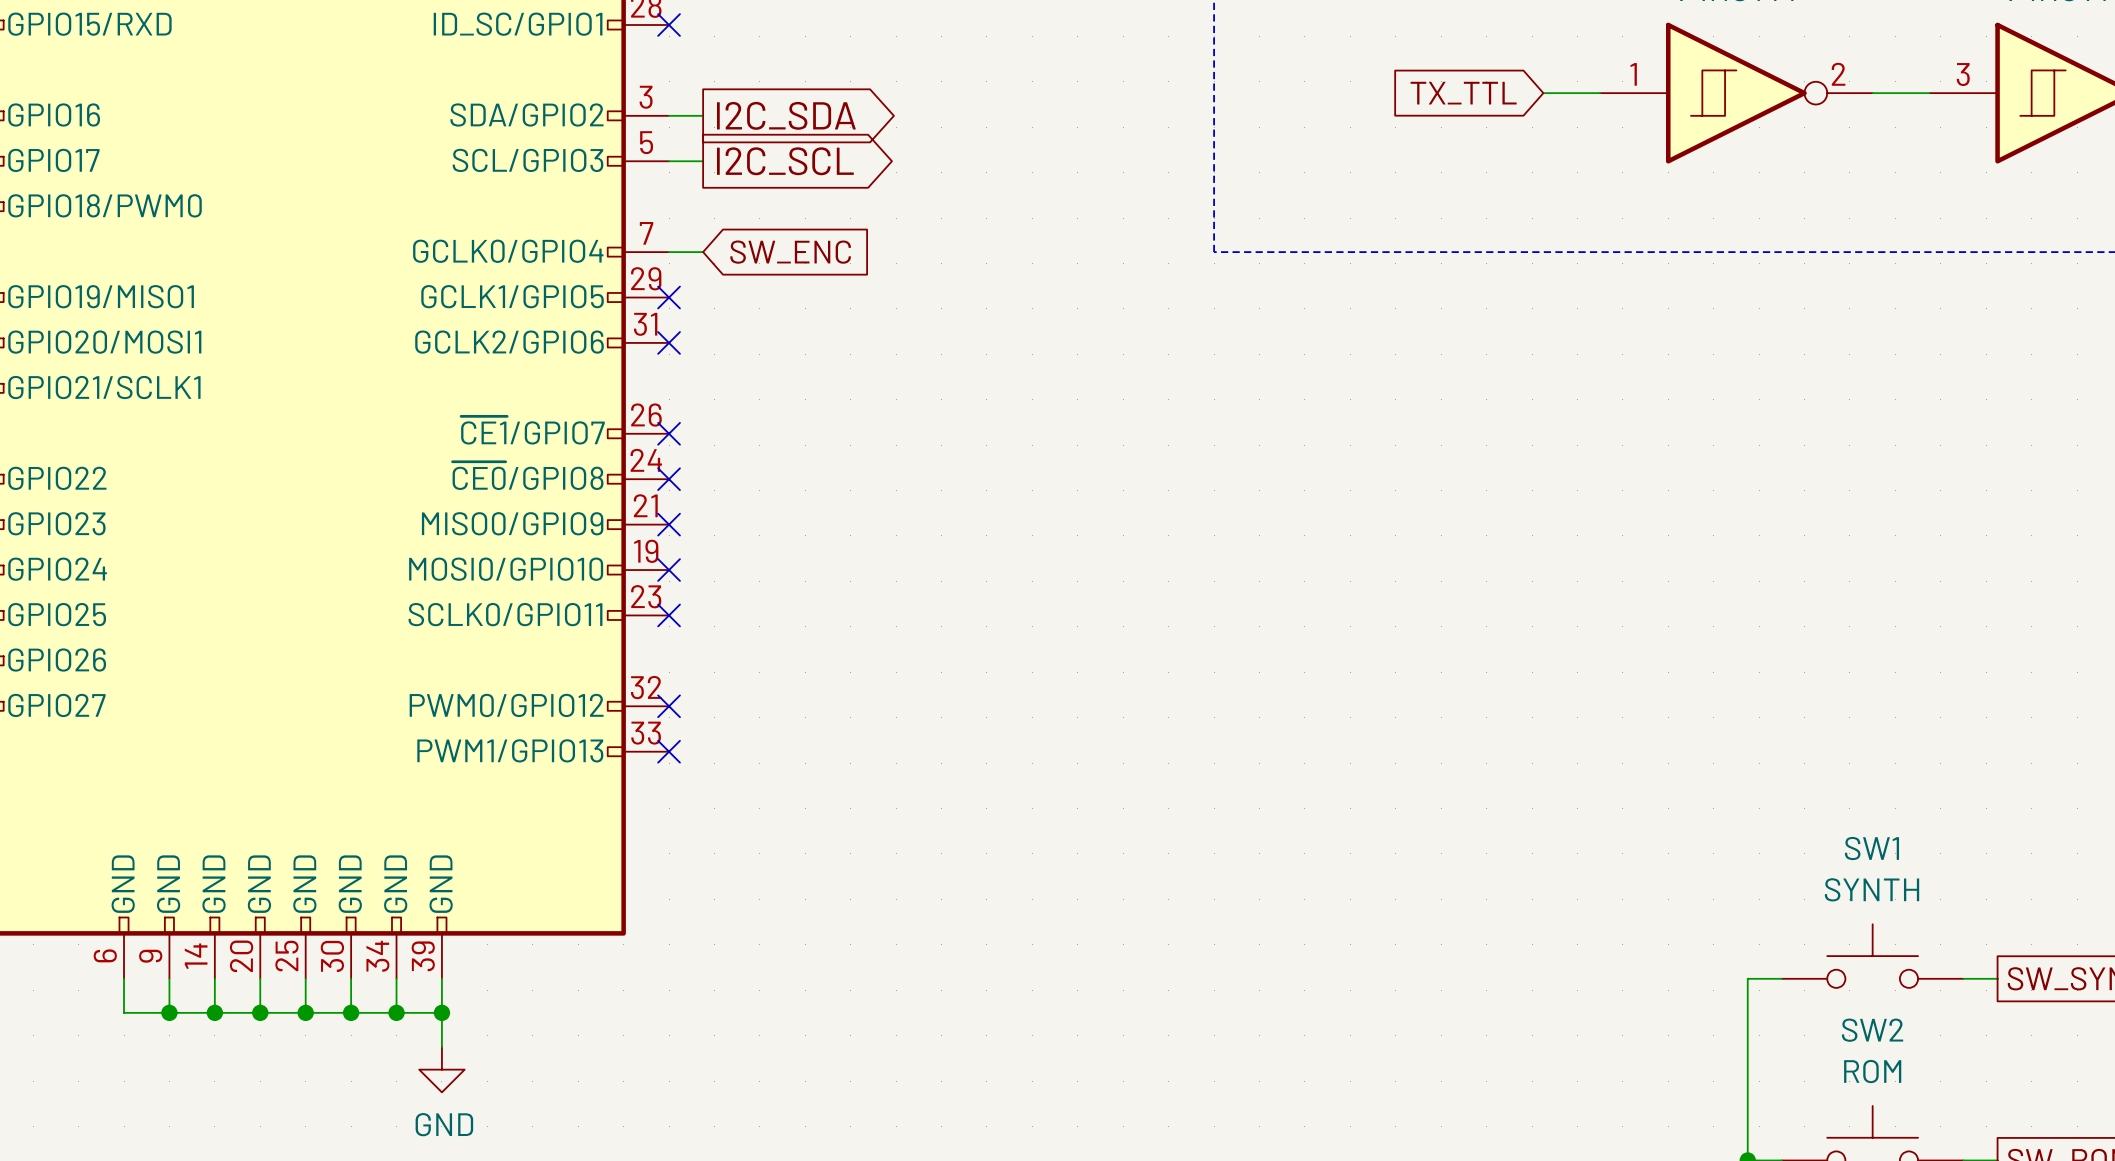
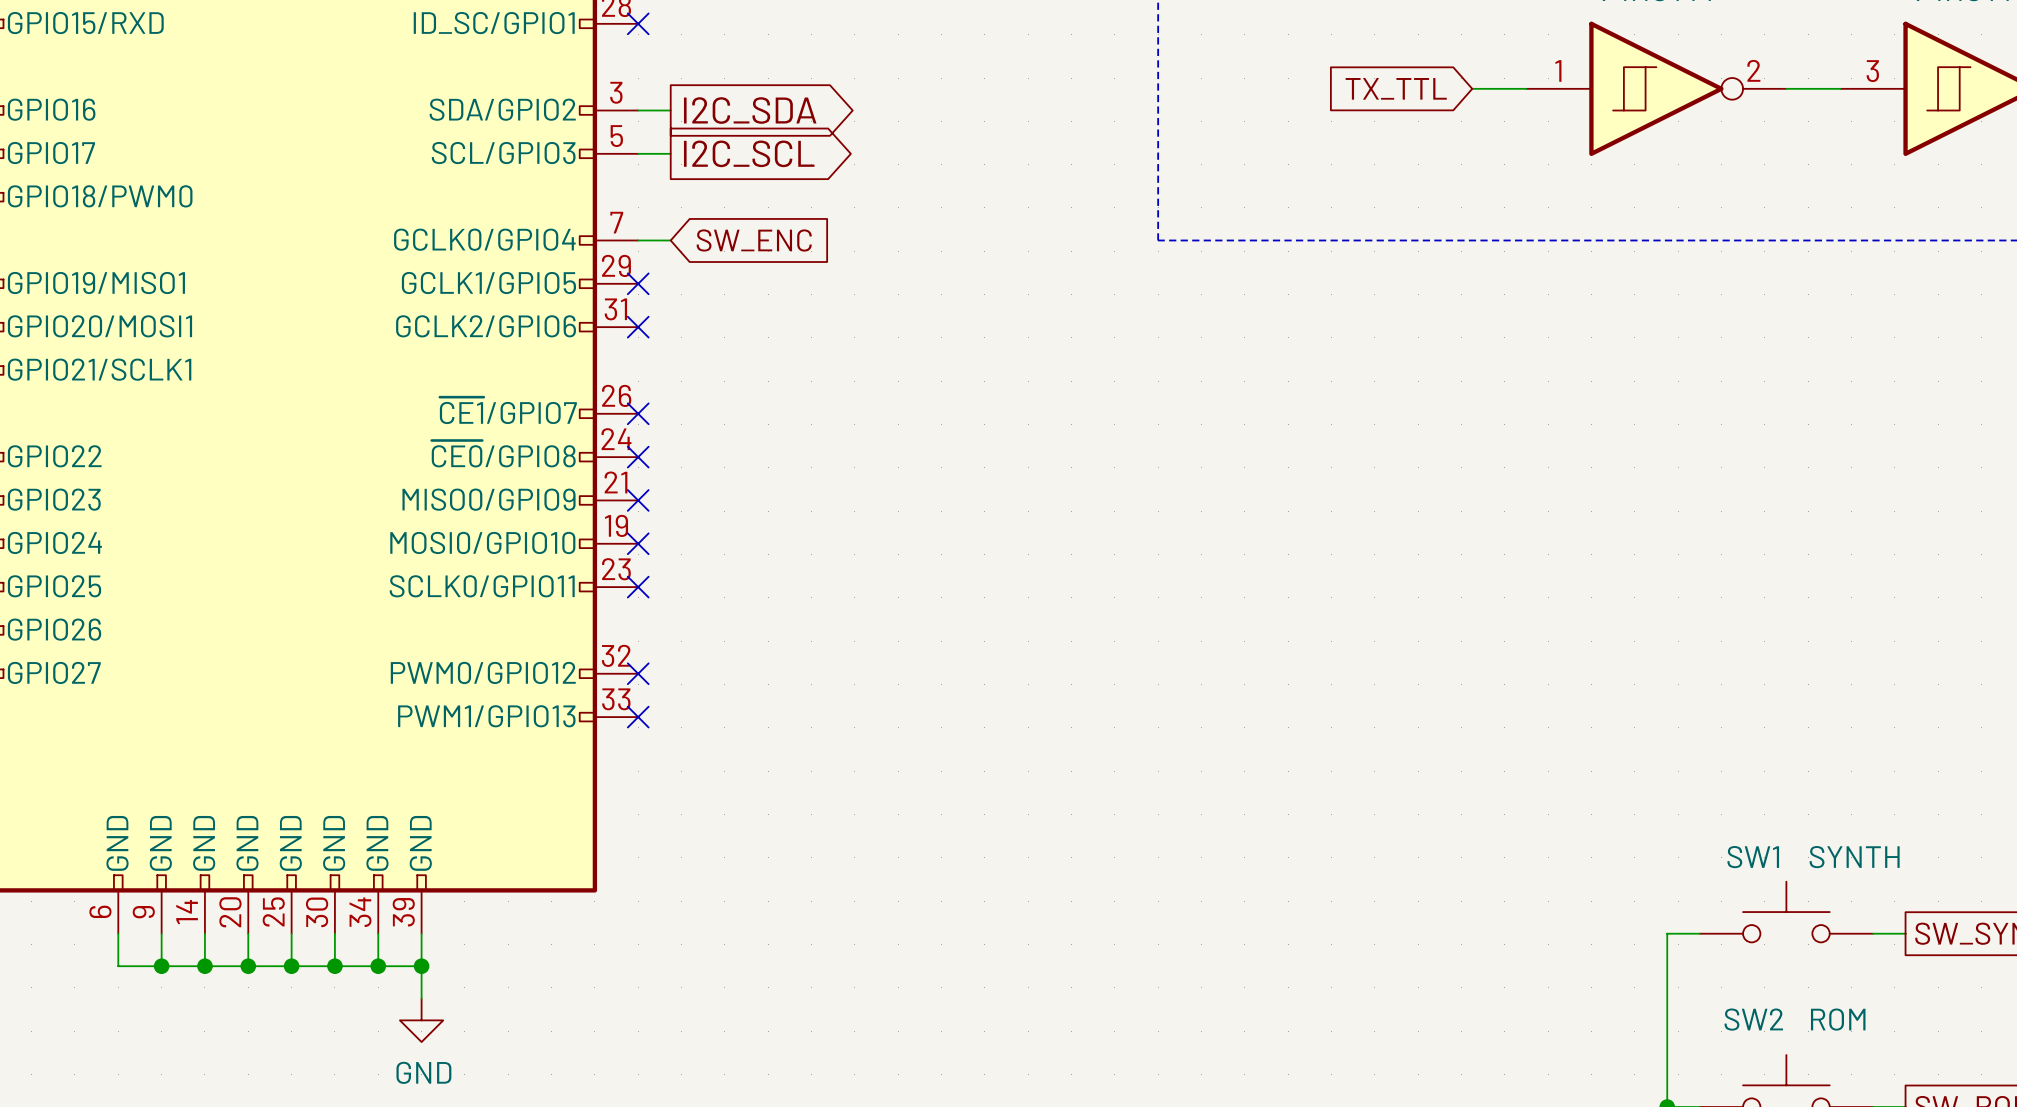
SW1 name position: SW1 (1871, 848) -> SW1 (1753, 857)
SW1 value position: SYNTH (1872, 889) -> SYNTH (1854, 857)
SW2 name position: SW2 (1872, 1030) -> SW2 (1753, 1019)
SW2 value position: ROM (1872, 1071) -> ROM (1838, 1019)

